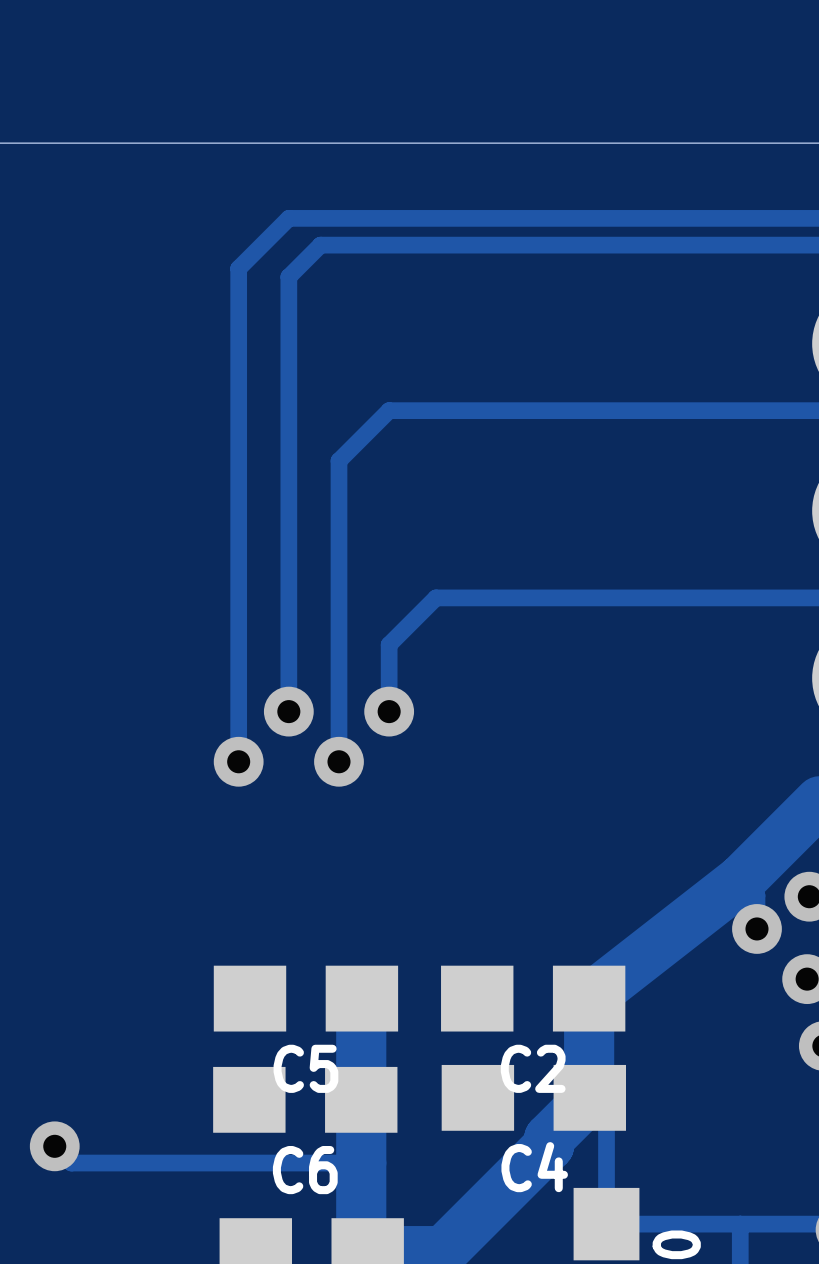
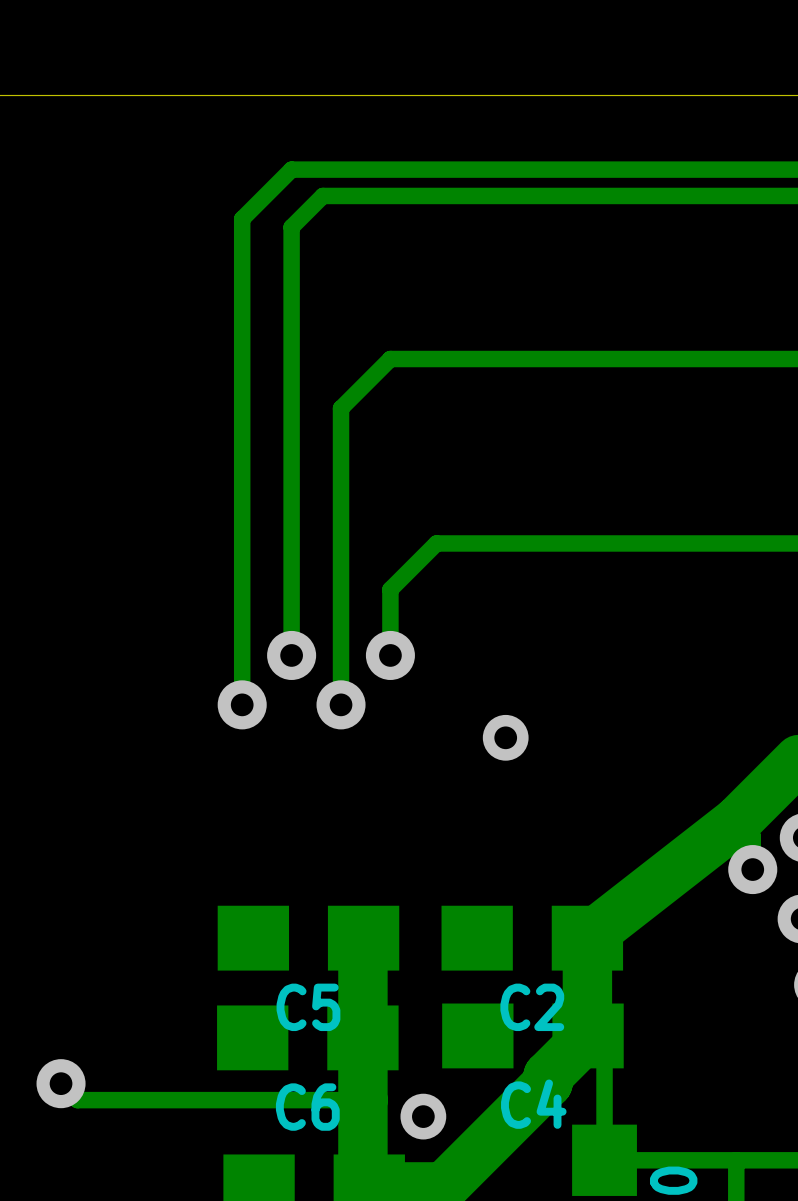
via: none -> (505, 737)
via: none -> (423, 1116)

